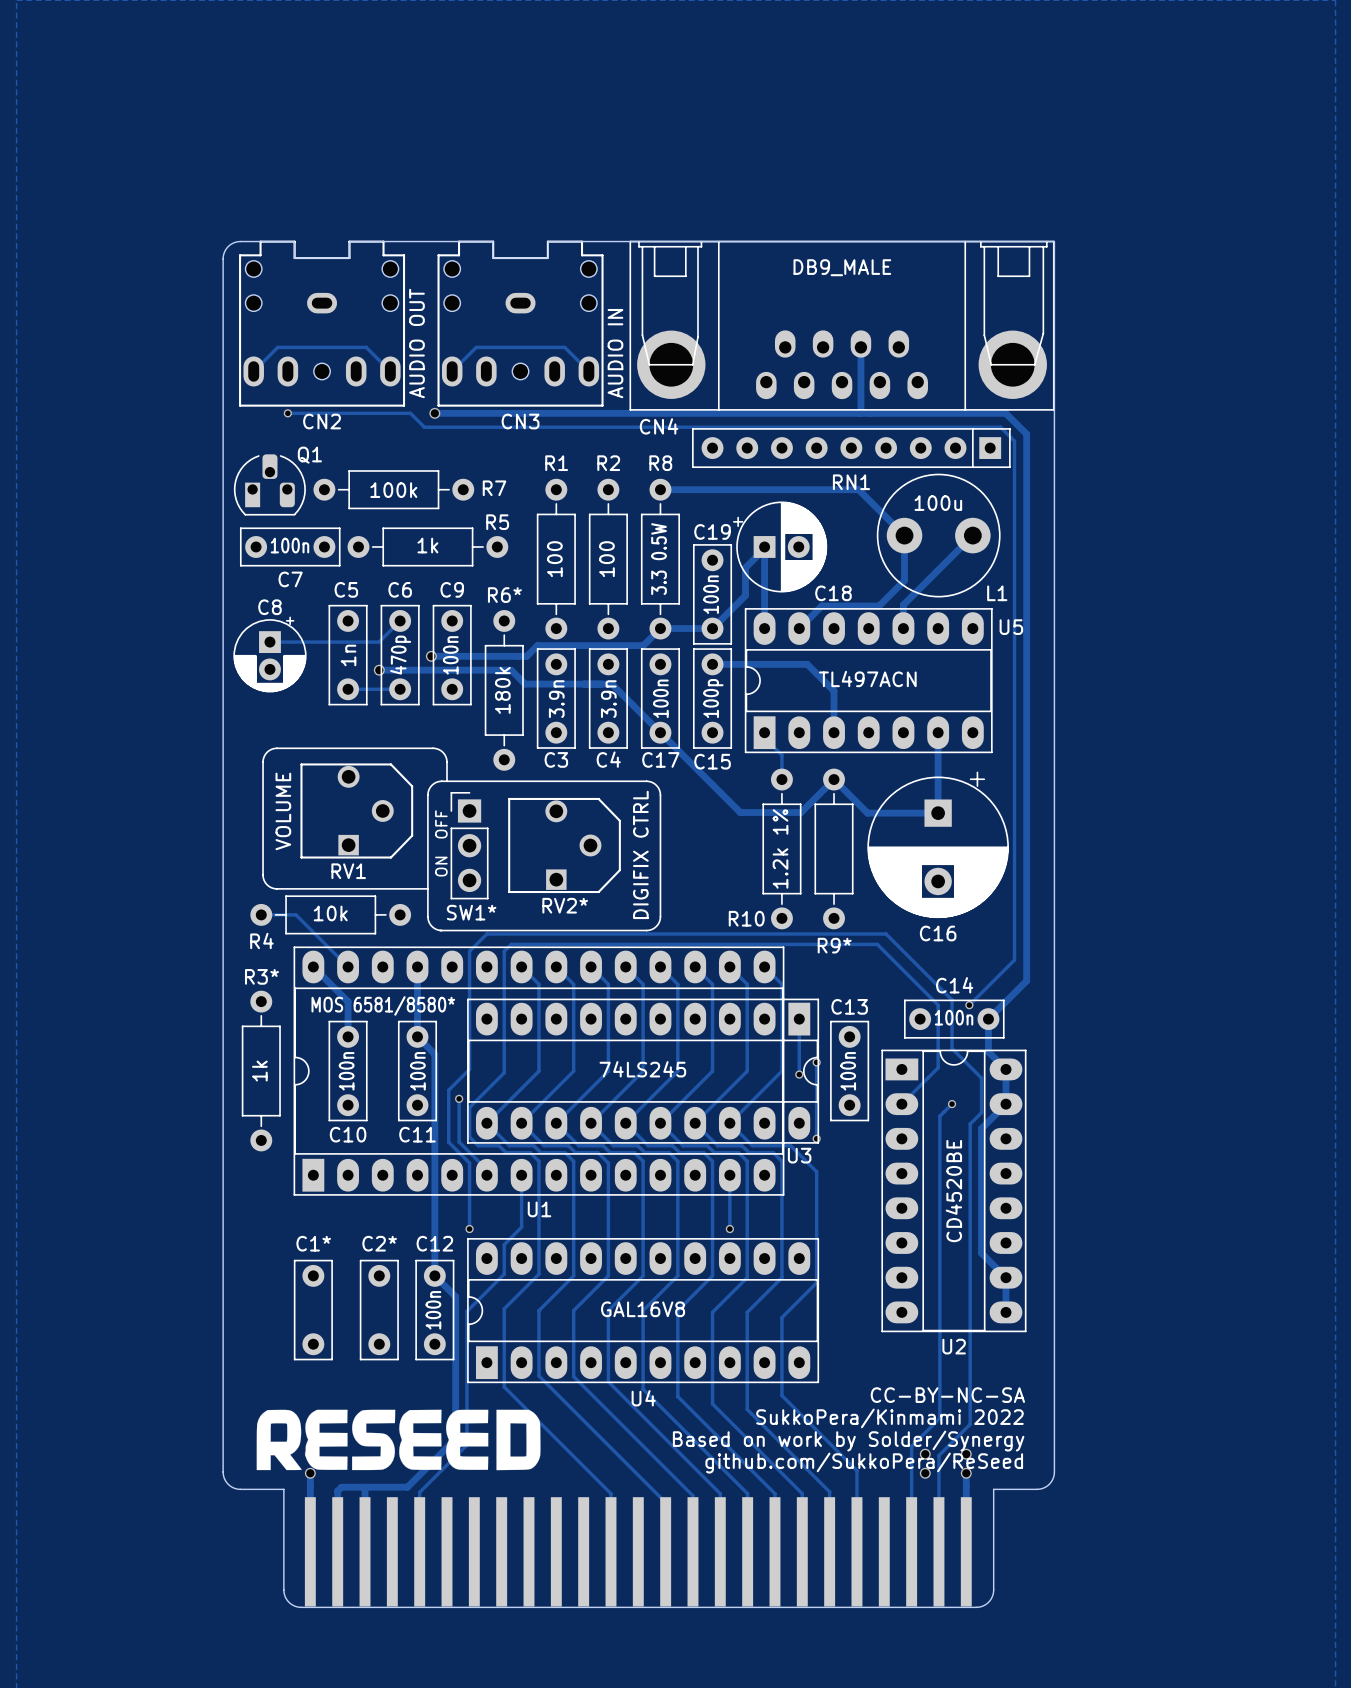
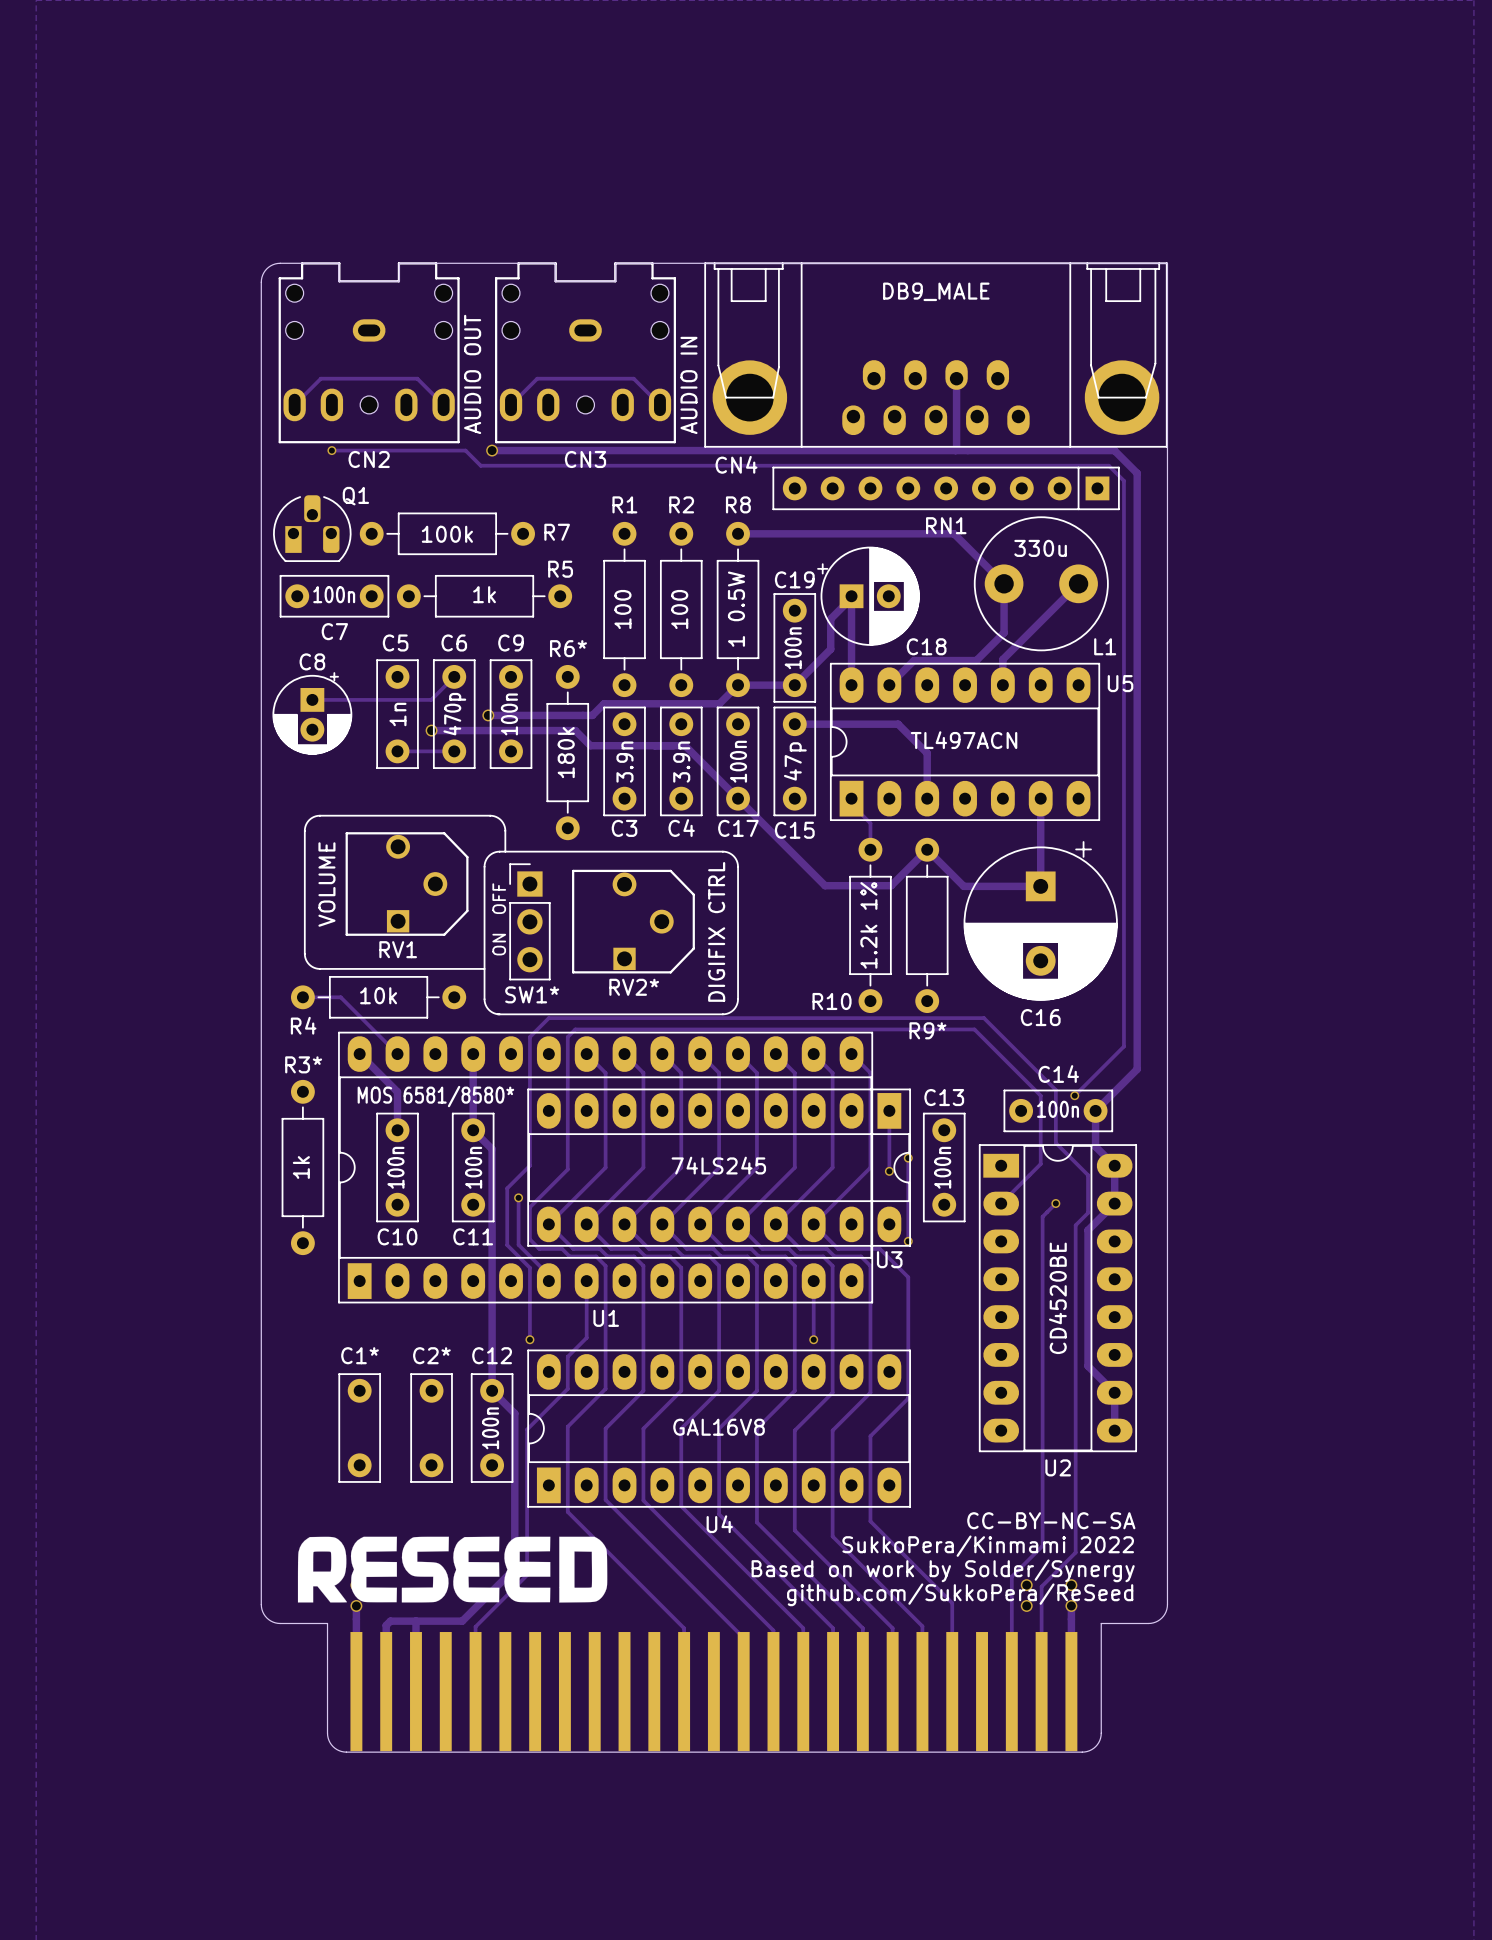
L1 value: 100u (938, 503) -> 330u (1040, 548)
text: 3.3 0.5W (659, 559) -> 1 0.5W (736, 609)
C15 value: 100p (713, 698) -> 47p (795, 761)

